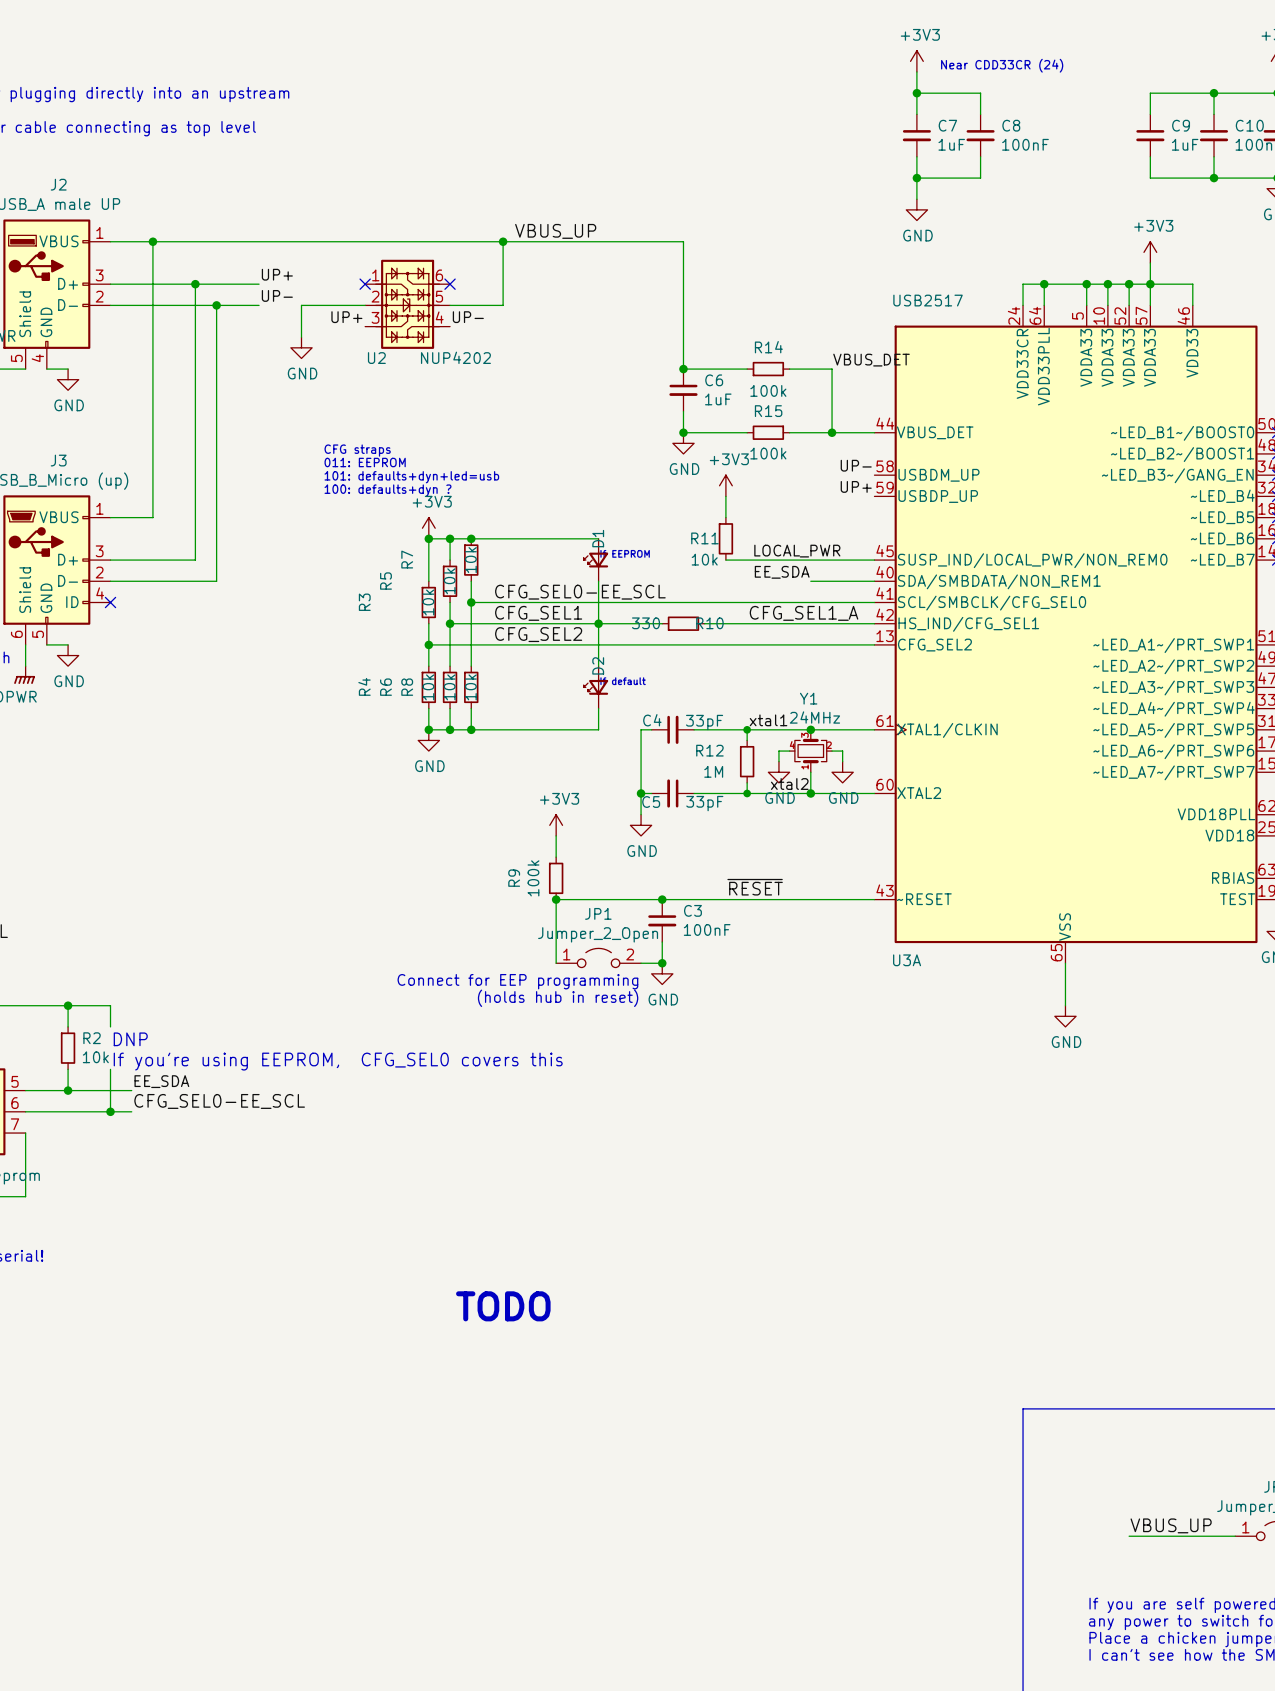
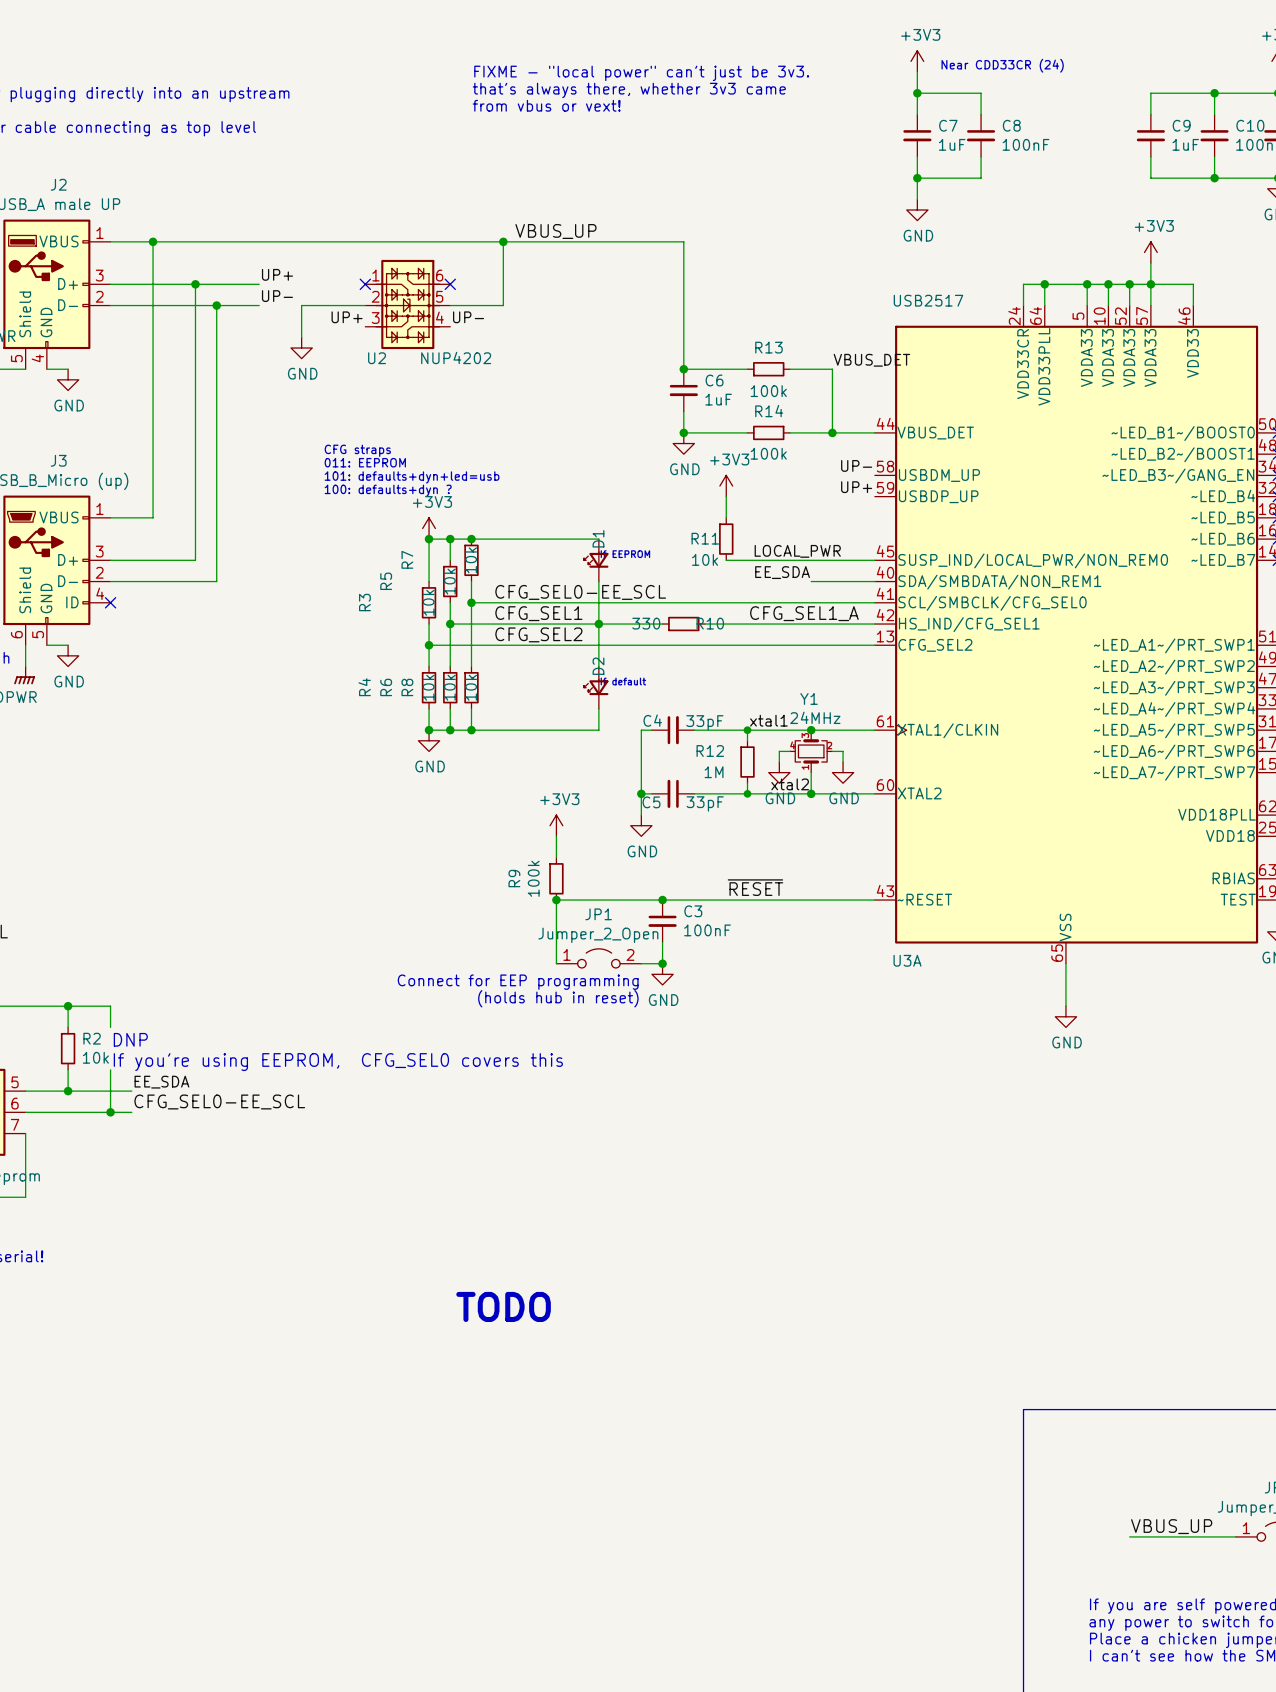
text: none -> FIXME - "local power" can't just be 3v3. (641, 73)
text: none -> that's always there, whether 3v3 came (629, 90)
text: none -> from vbus or vext! (546, 105)
R14 name: R14 (768, 347) -> R13 (768, 347)
R15 name: R15 (768, 411) -> R14 (769, 411)

